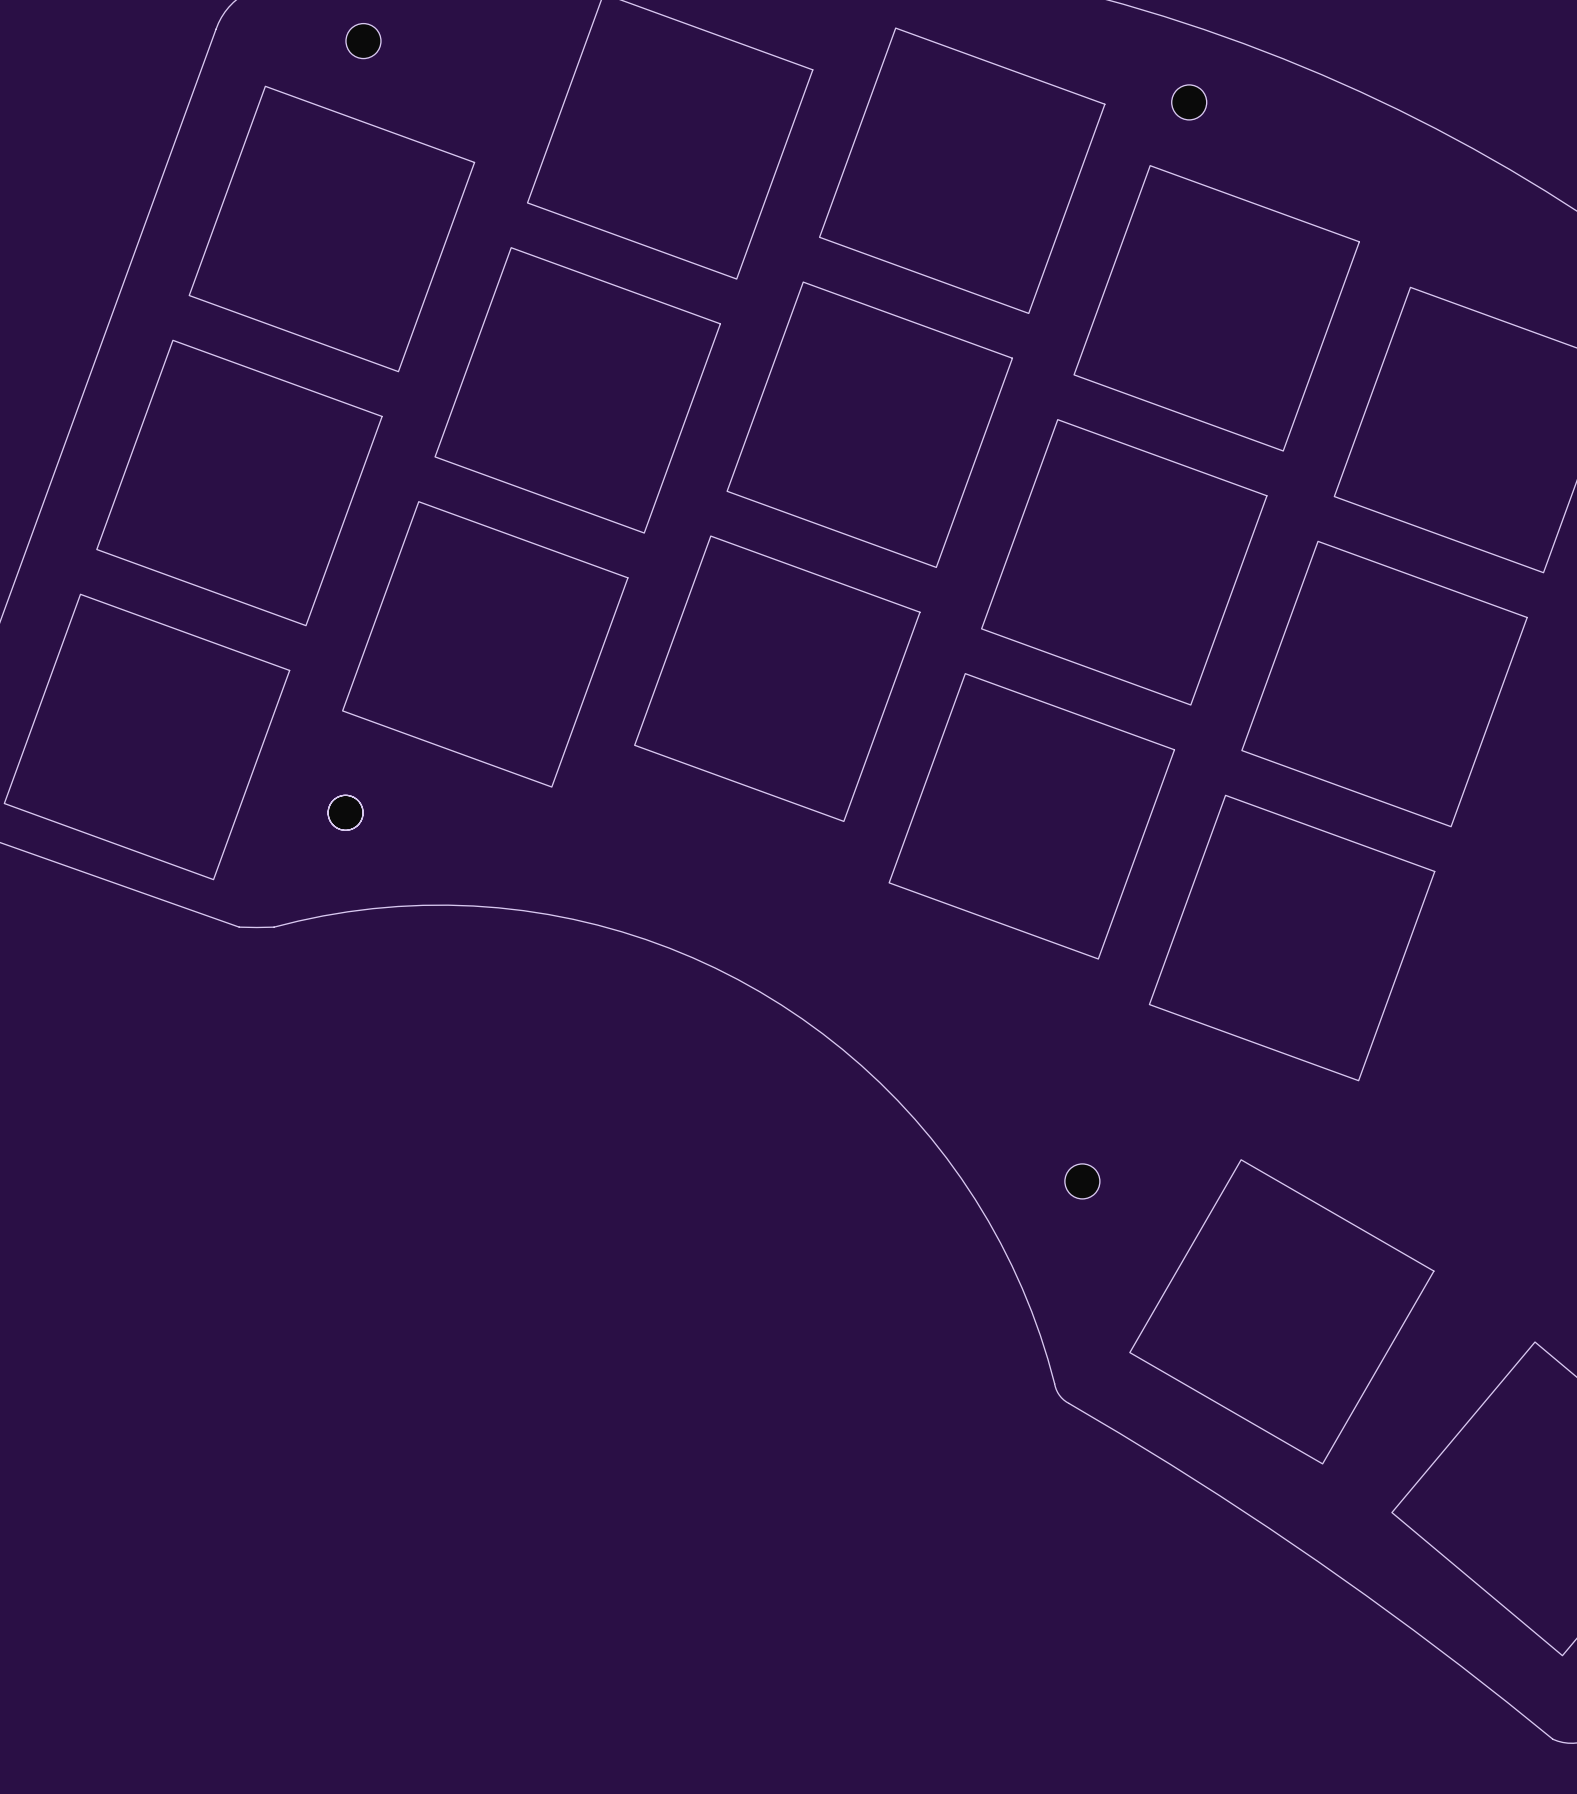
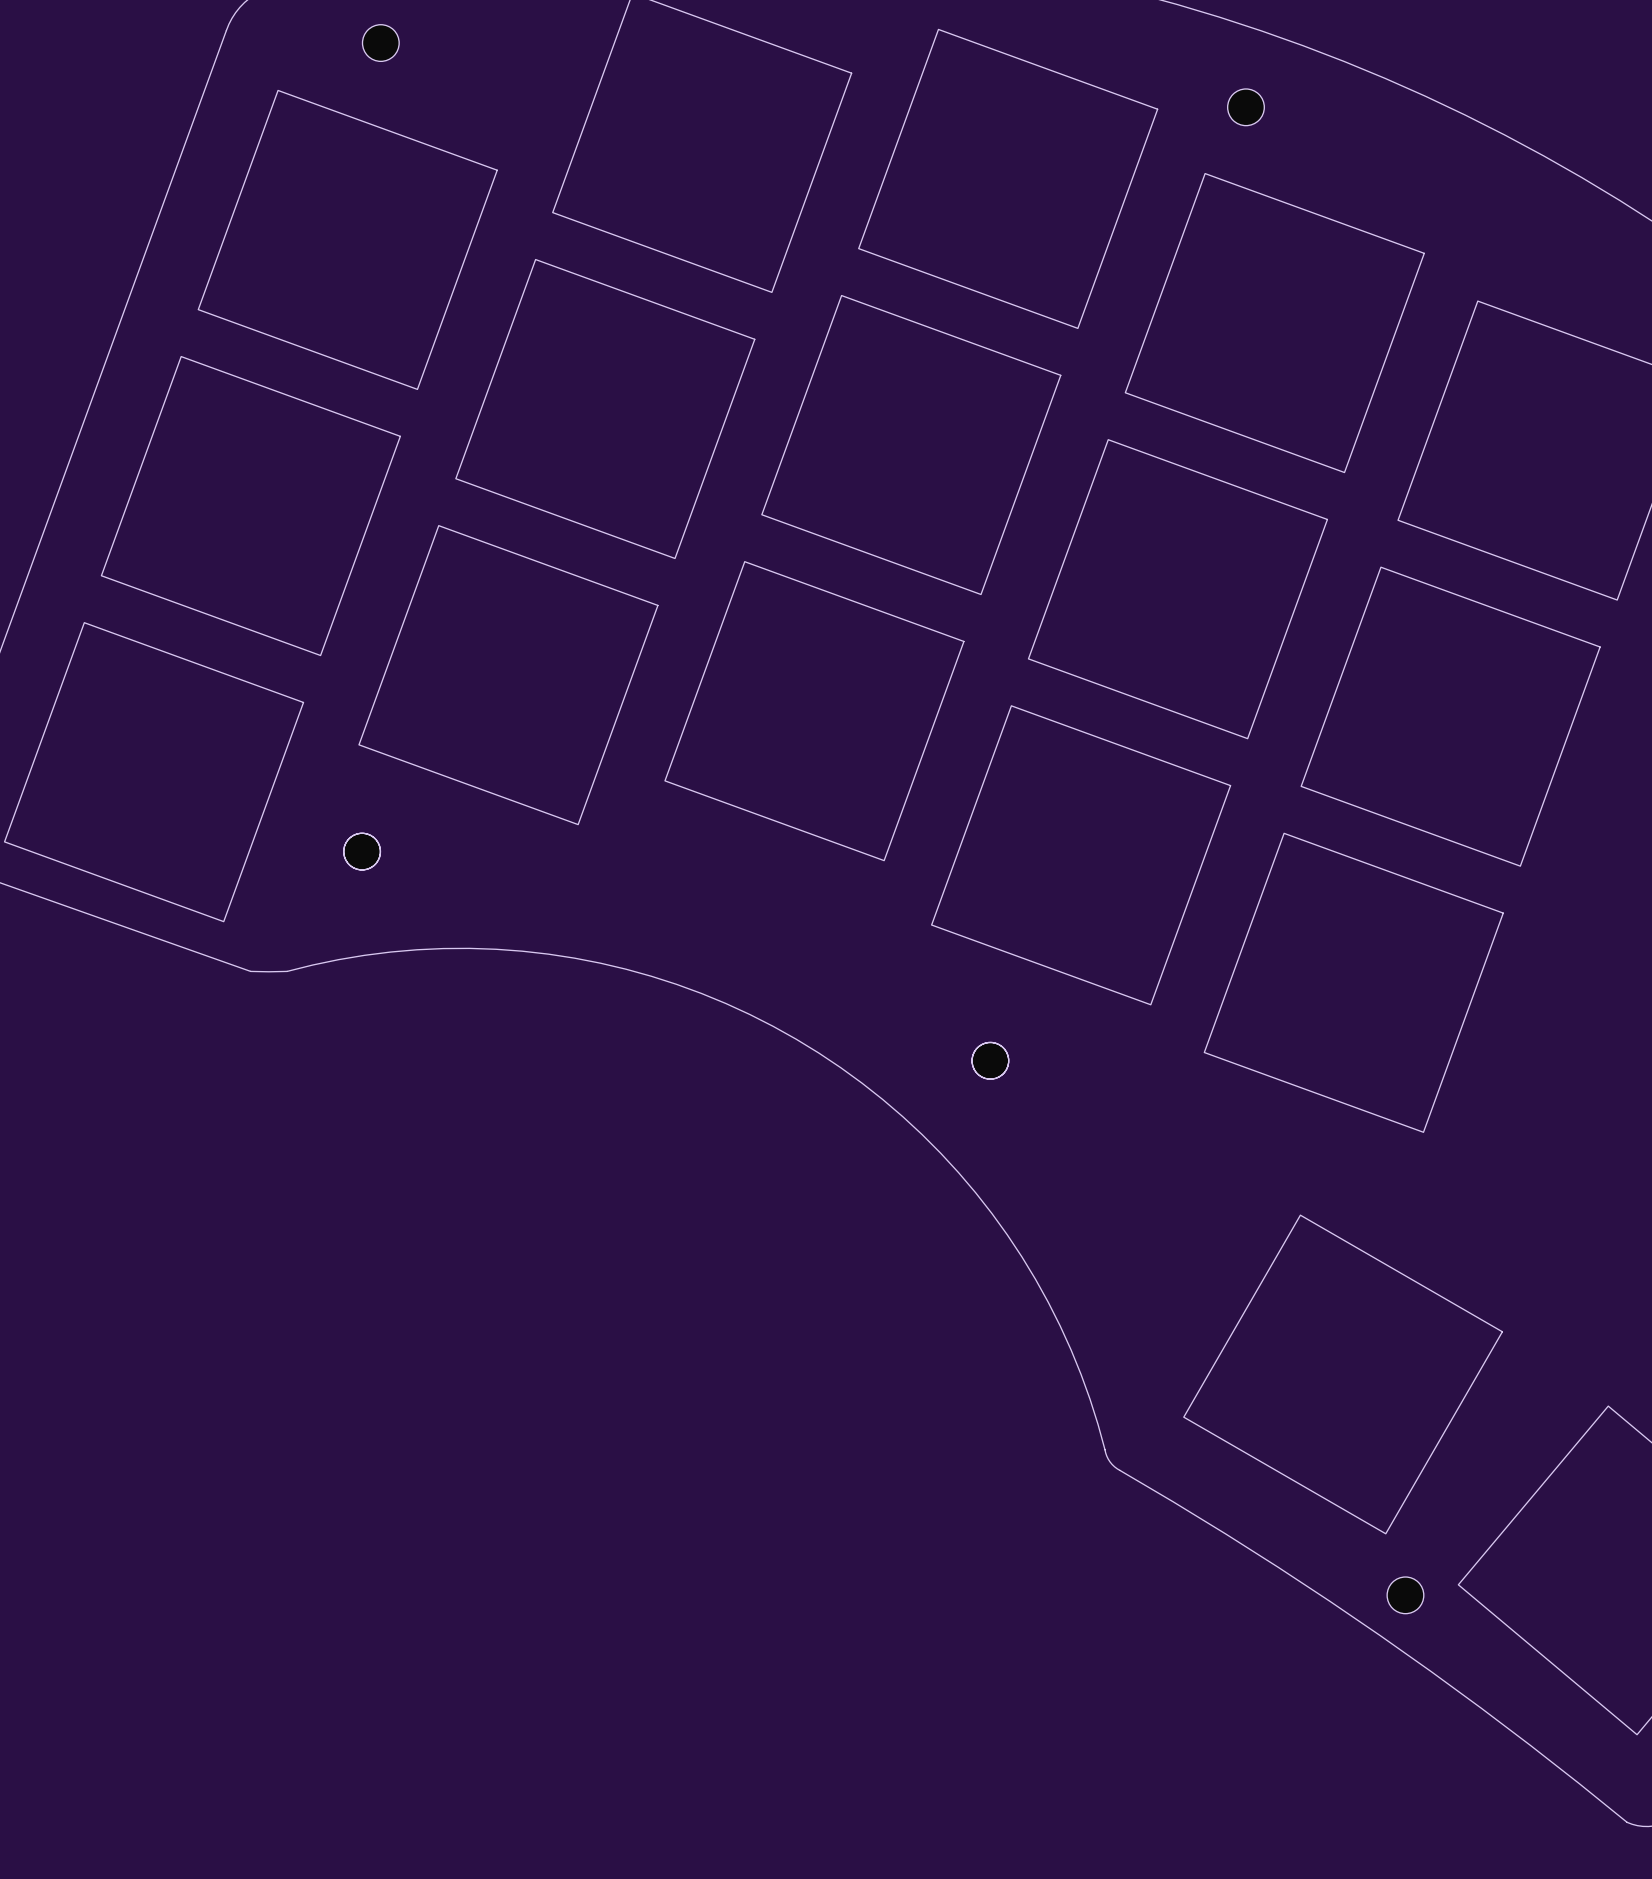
part: none -> (990, 1060)
part: (1082, 1181) -> none
part: none -> (1405, 1595)

